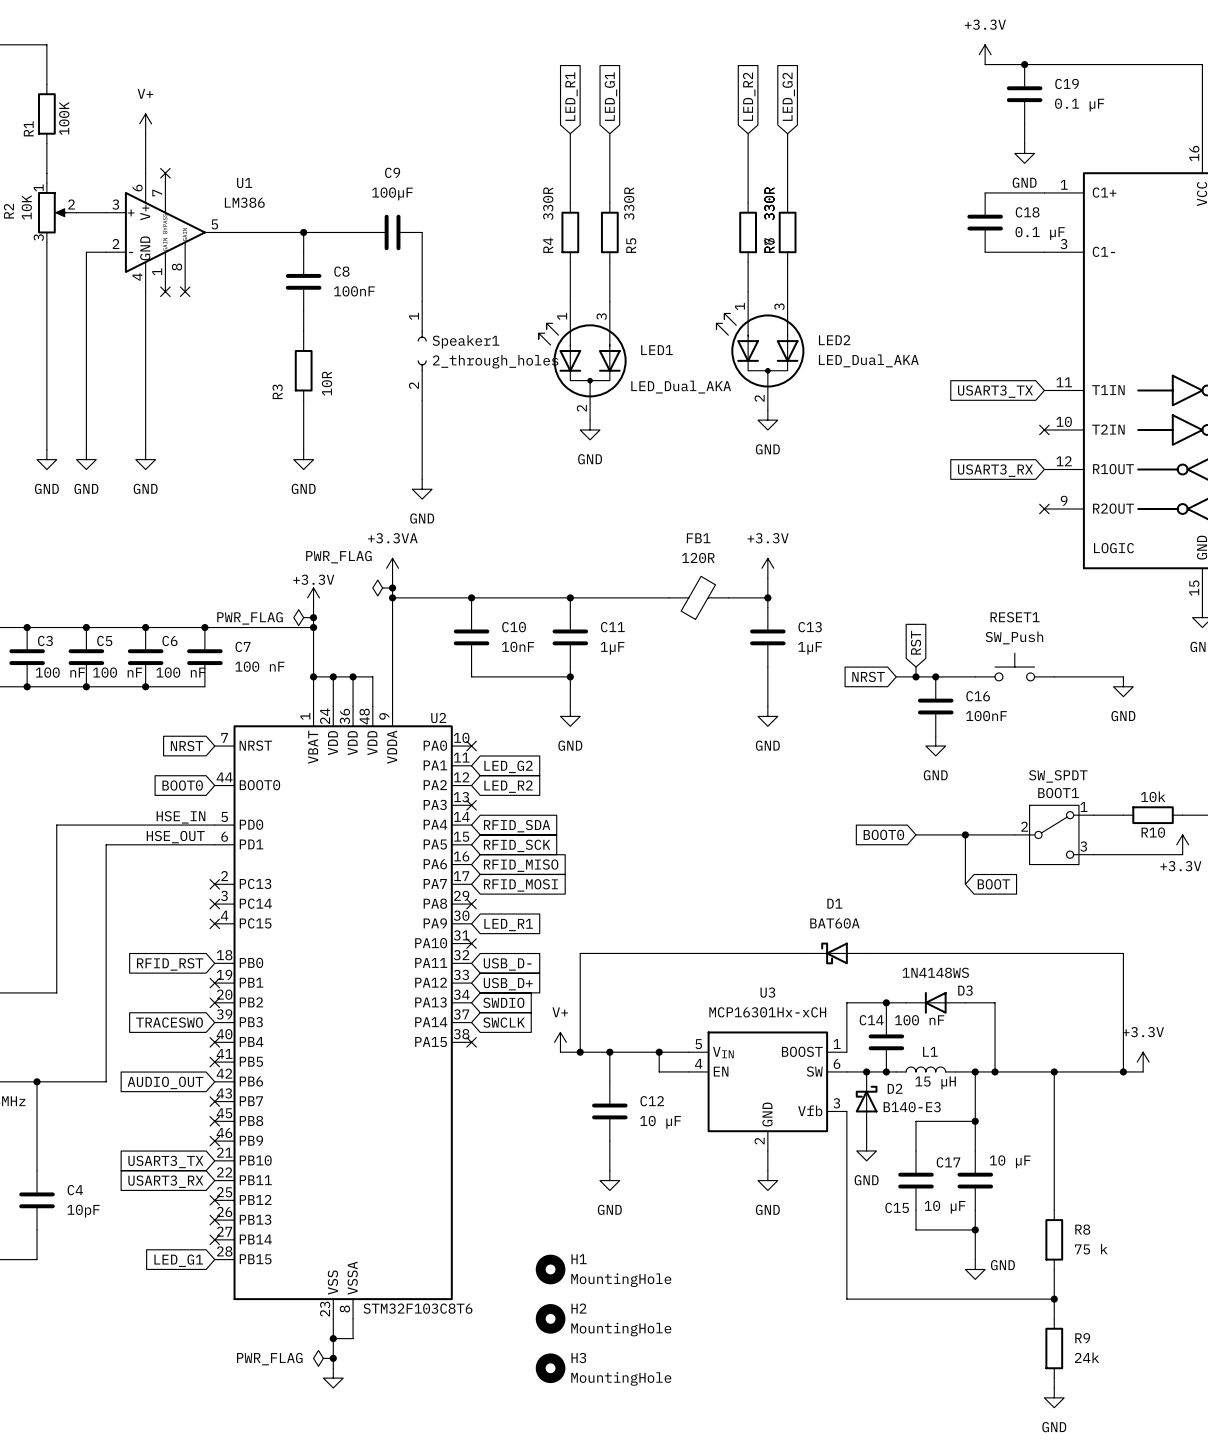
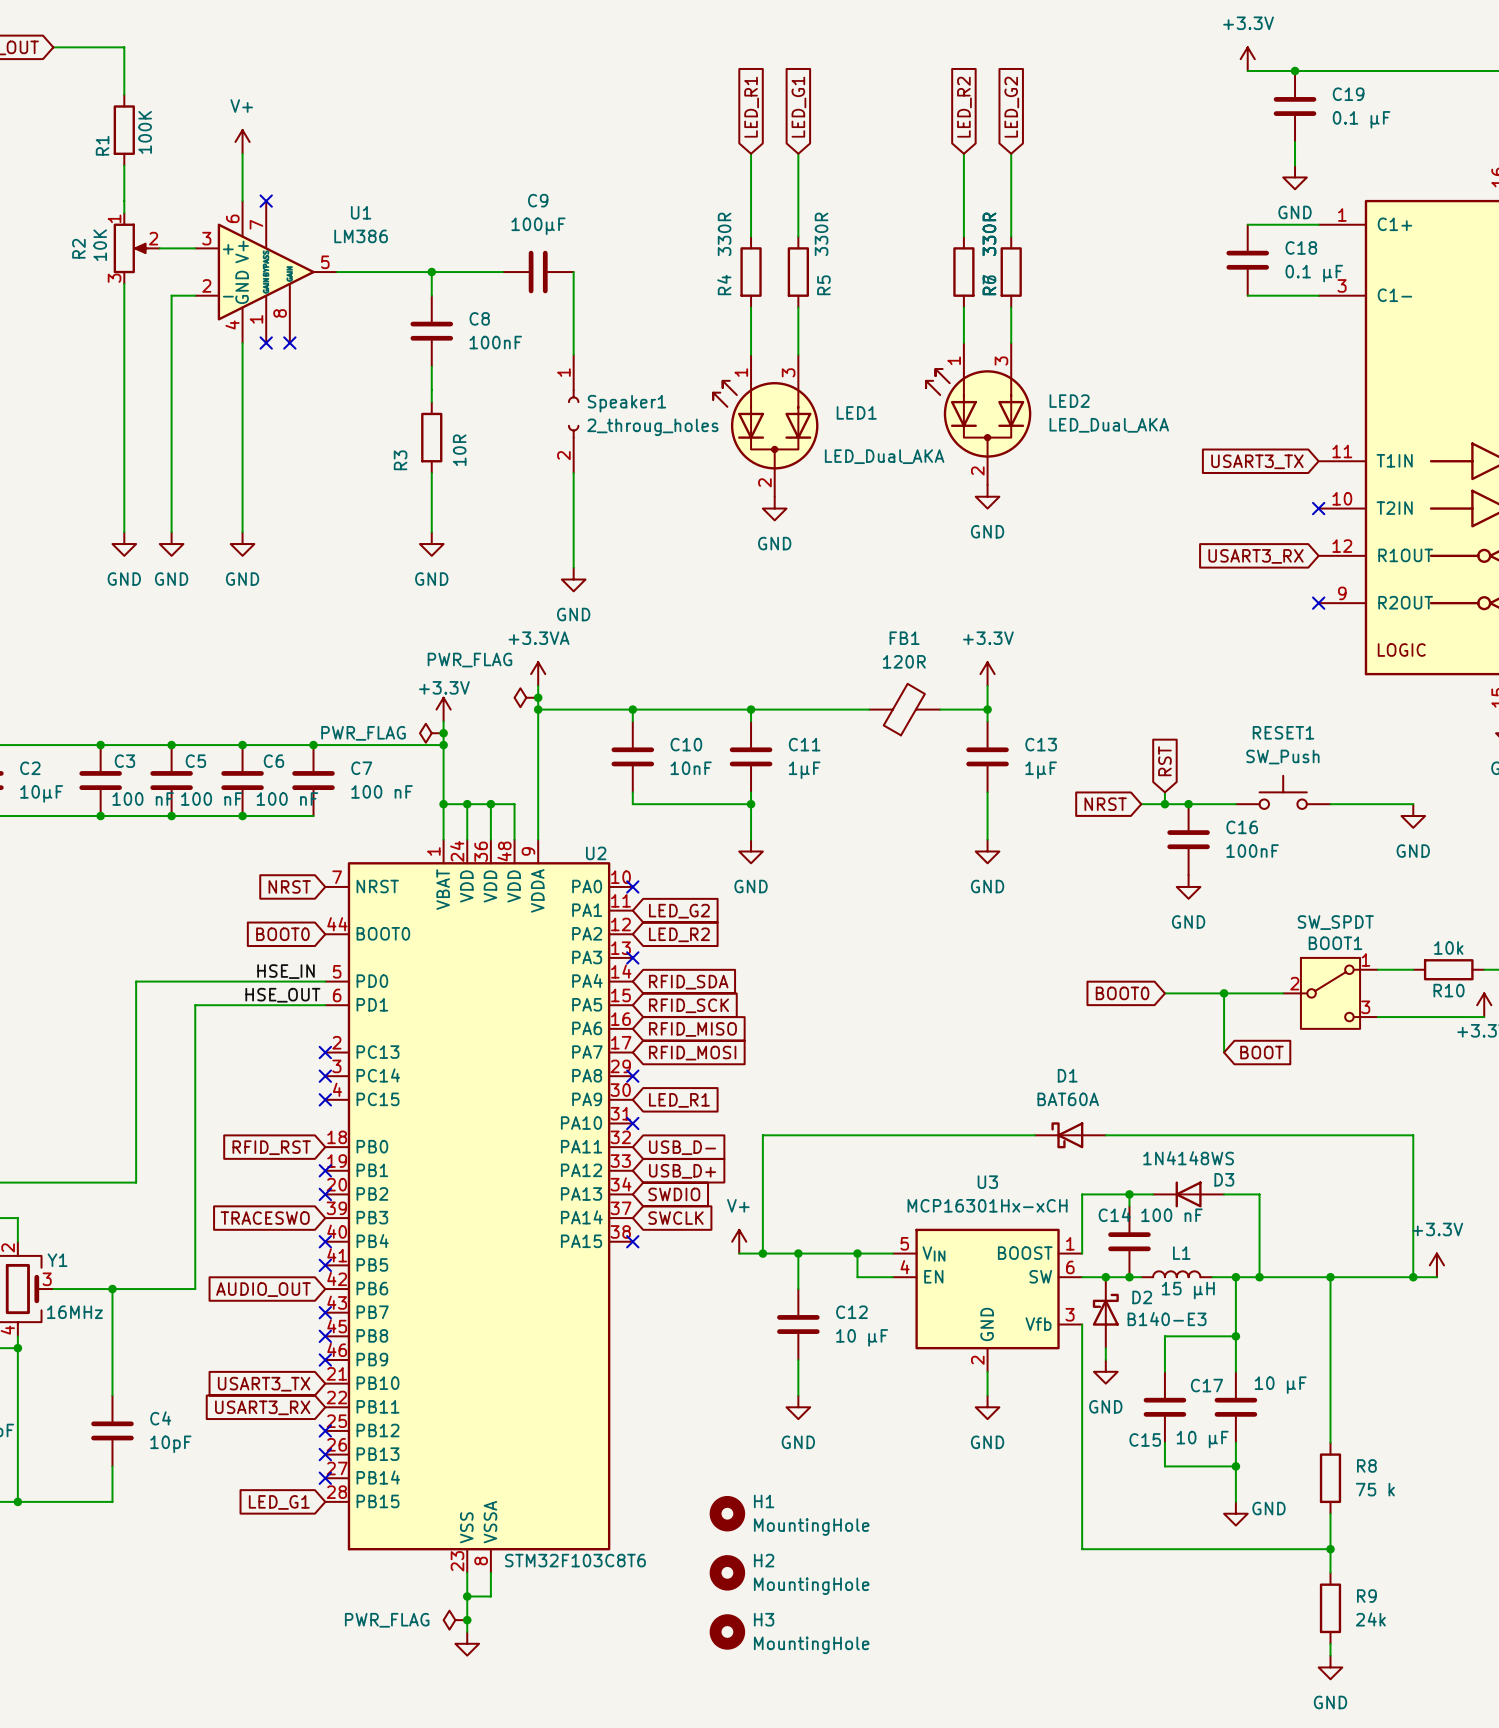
Speaker1 value: 2_through_holes (495, 361) -> 2_throug_holes (652, 427)

